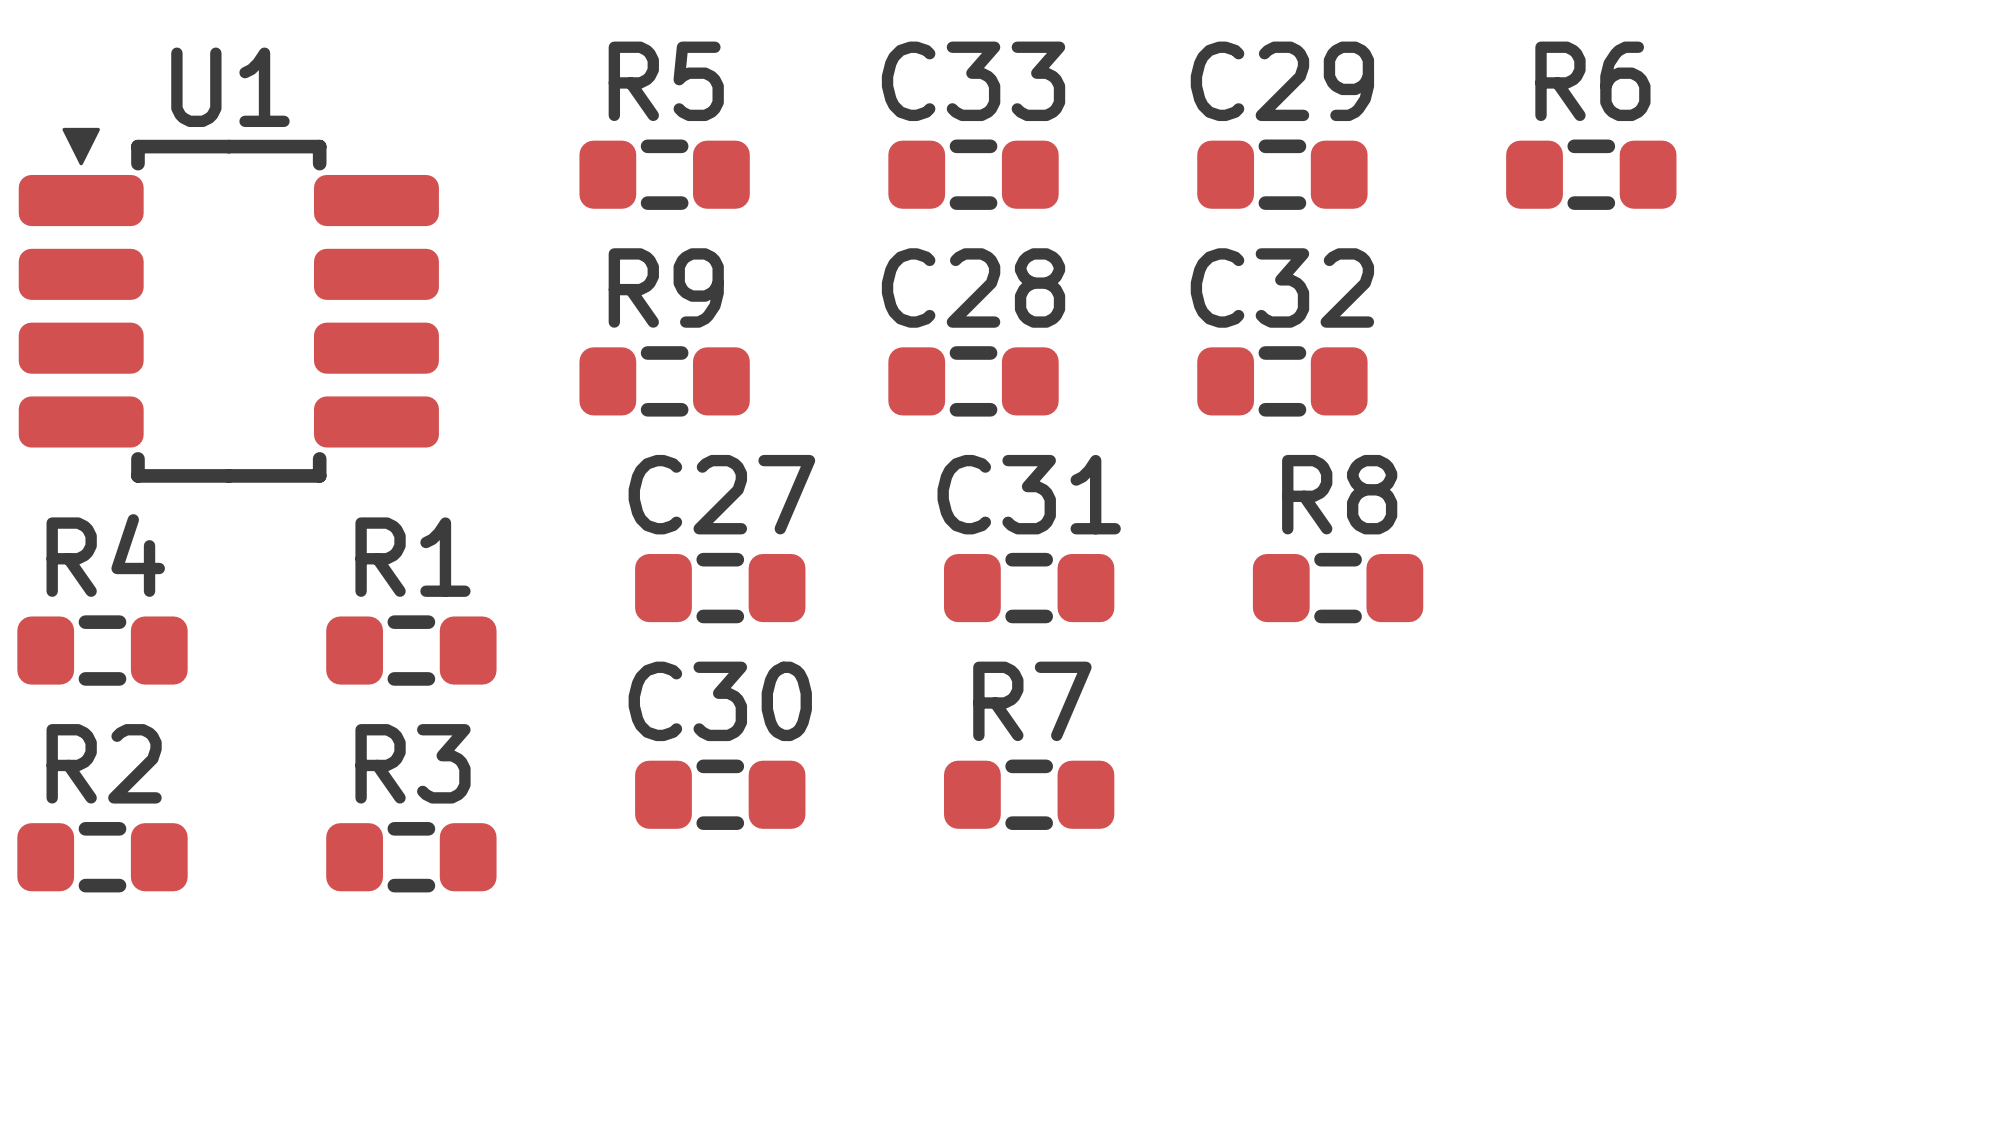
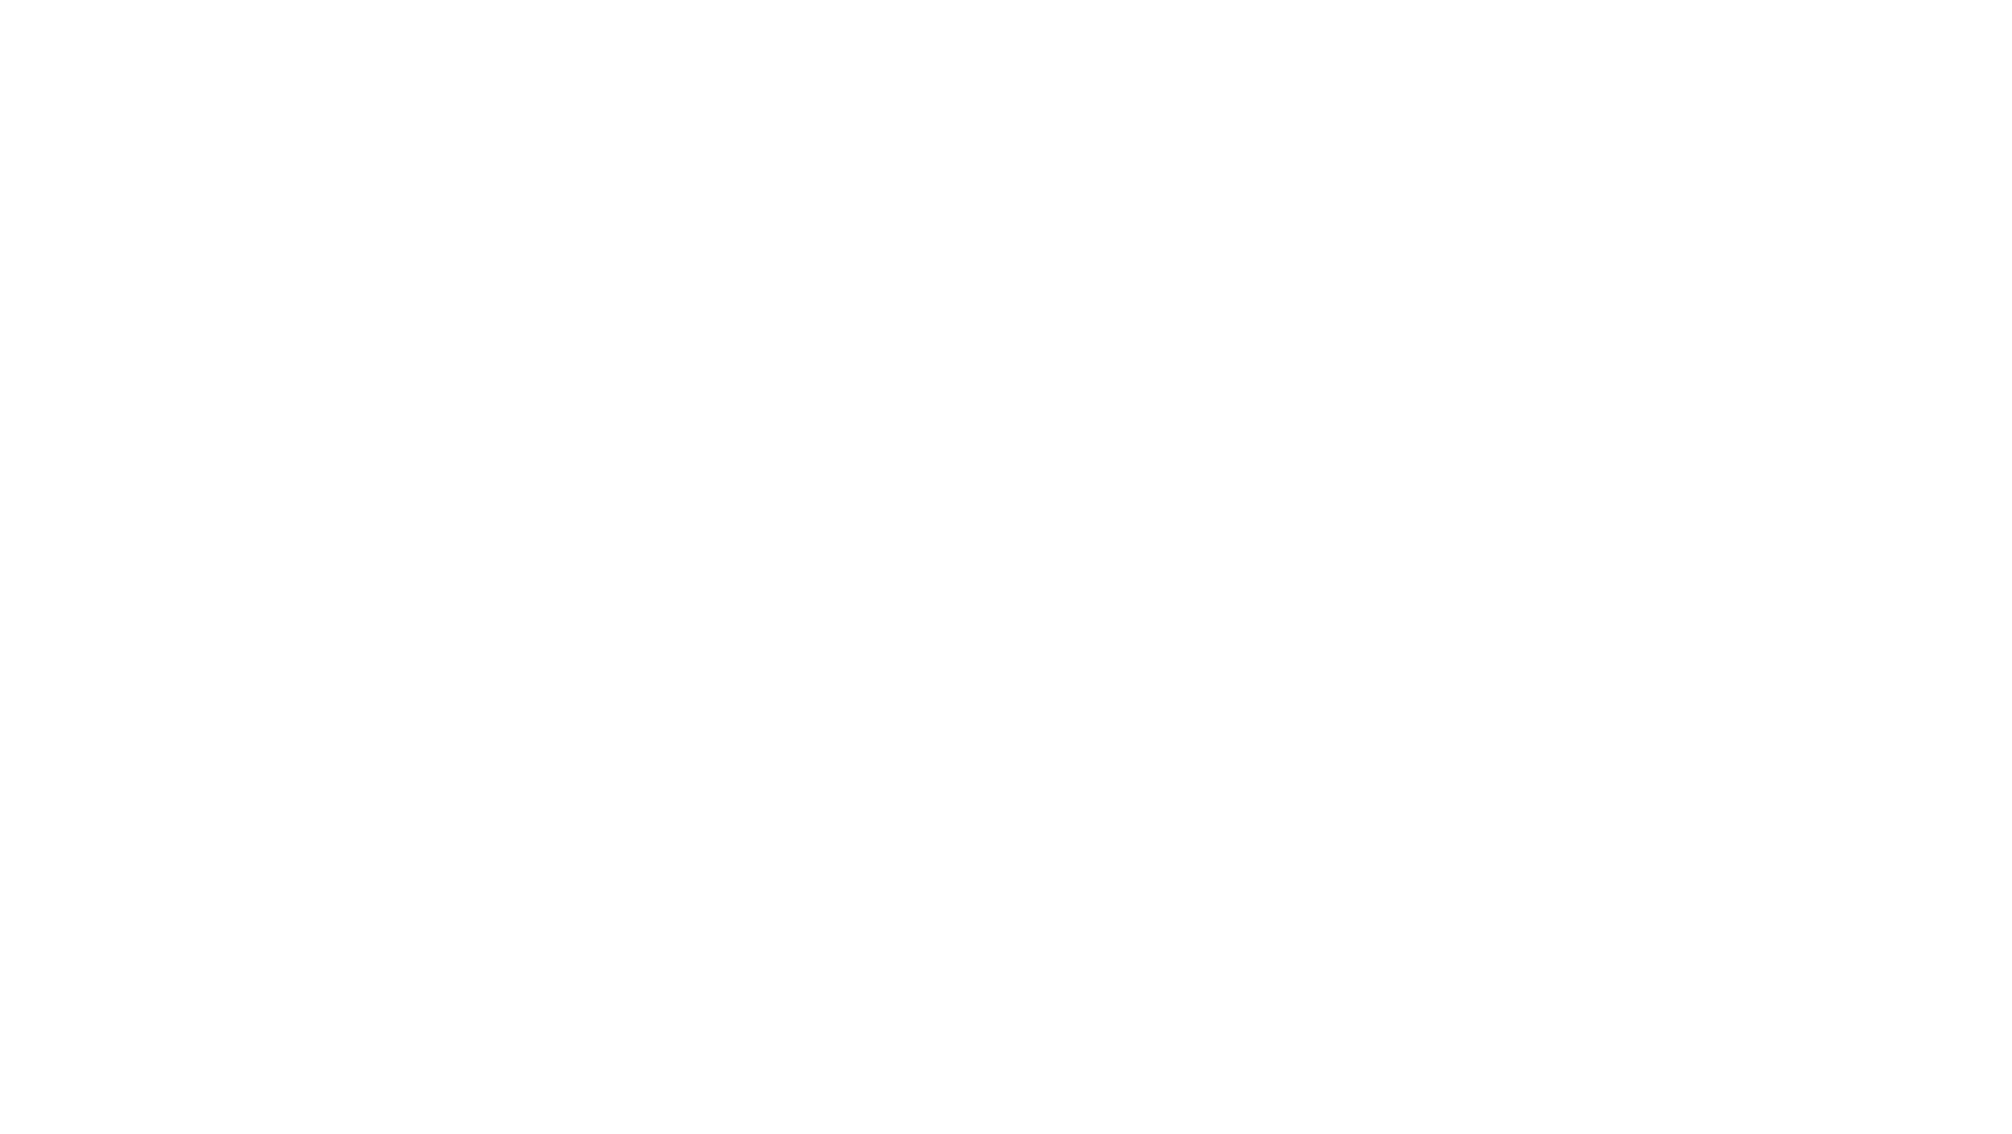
R5: (664, 174) -> none
C33: (973, 174) -> none
C29: (1282, 174) -> none
R6: (1591, 174) -> none
U1: (228, 305) -> none
R9: (664, 381) -> none
C28: (973, 381) -> none
C32: (1282, 381) -> none
C27: (720, 588) -> none
C31: (1029, 588) -> none
R8: (1338, 588) -> none
R4: (102, 650) -> none
R1: (411, 650) -> none
C30: (720, 794) -> none
R7: (1029, 794) -> none
R2: (102, 857) -> none
R3: (411, 857) -> none

